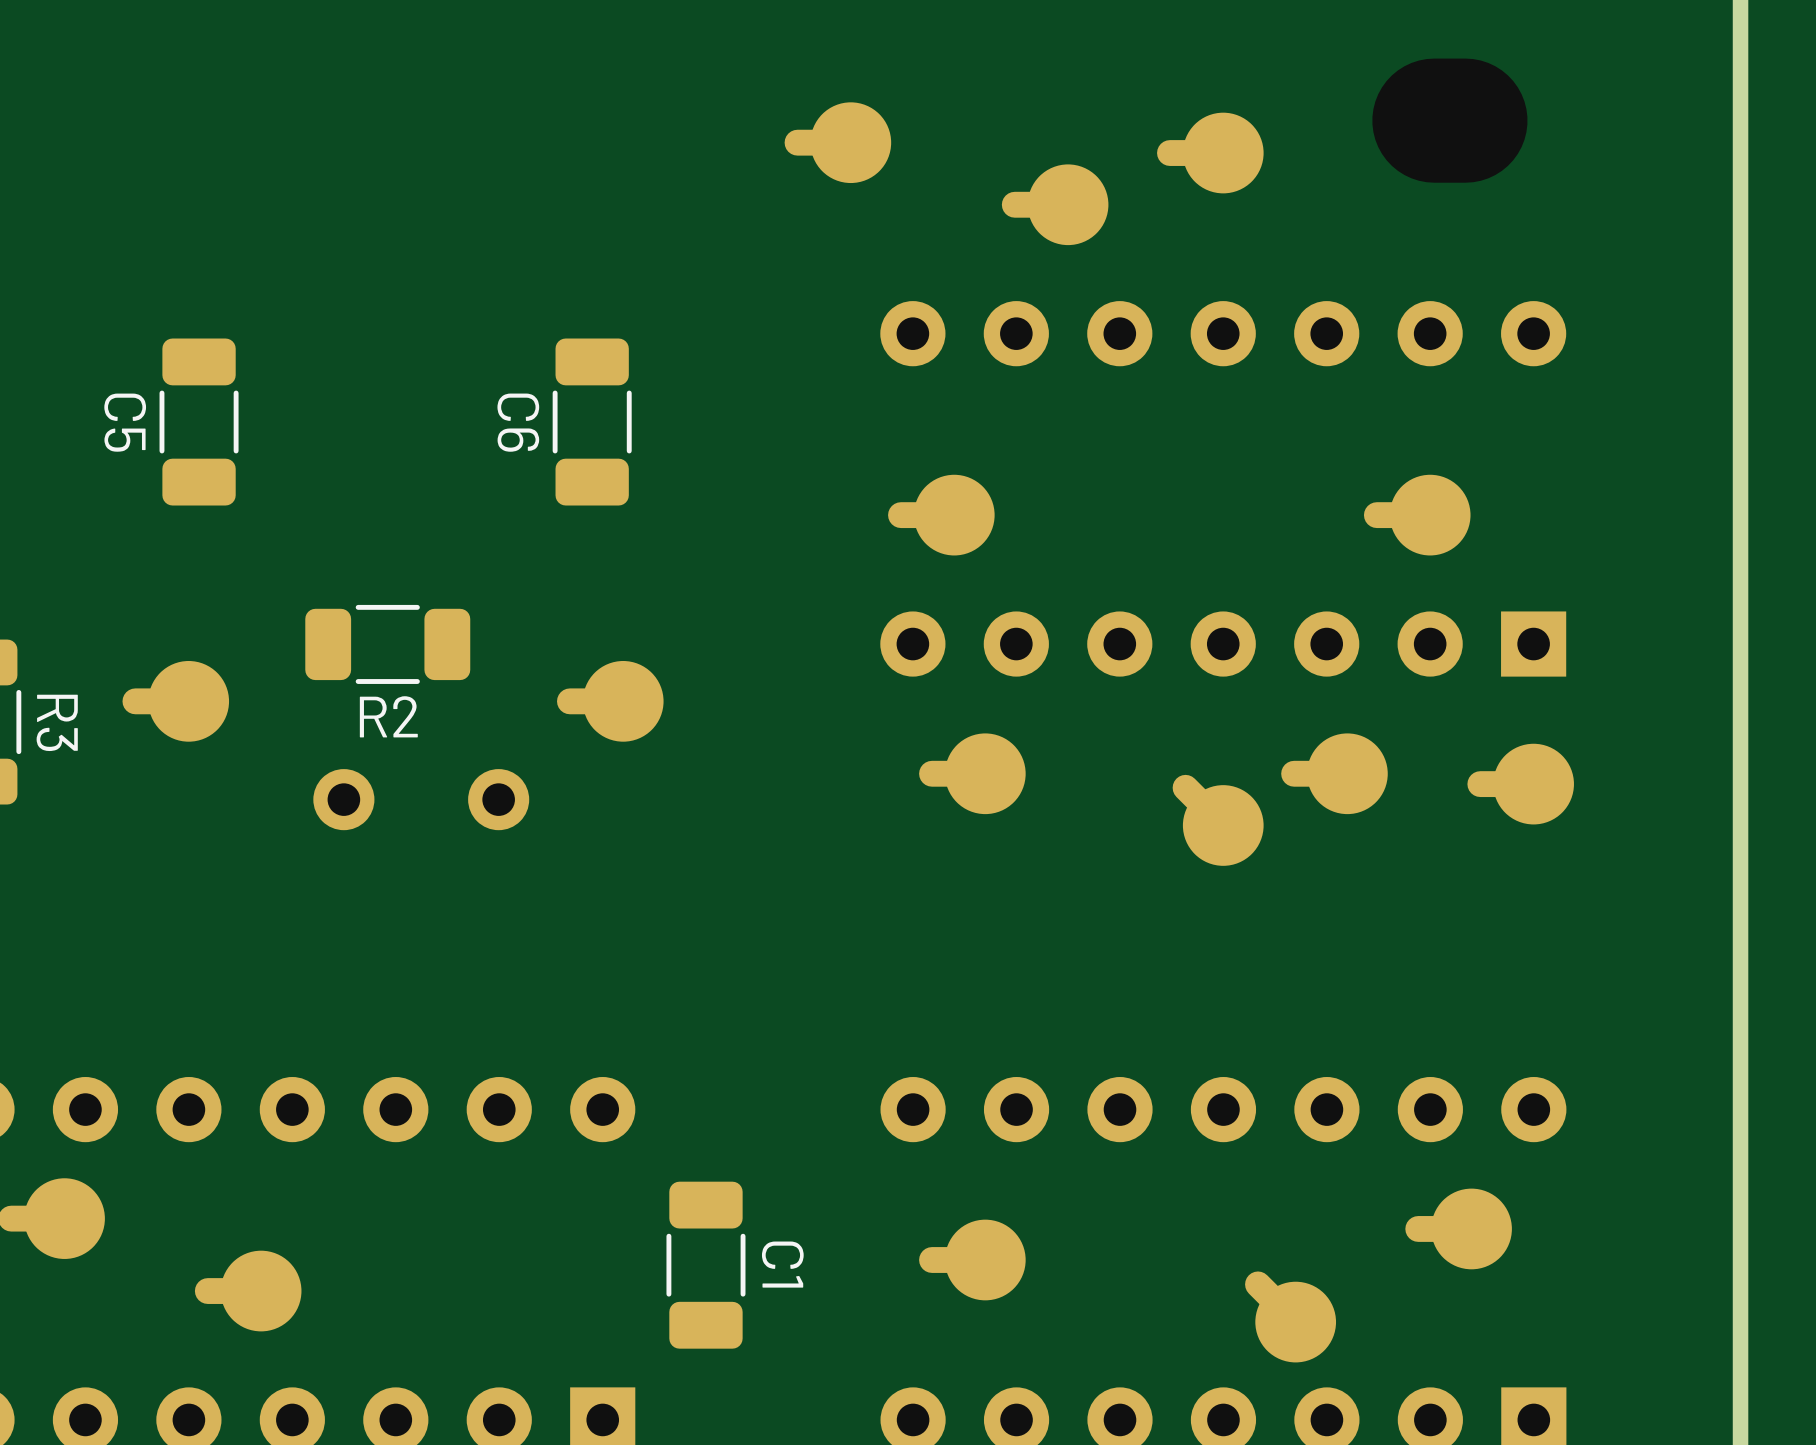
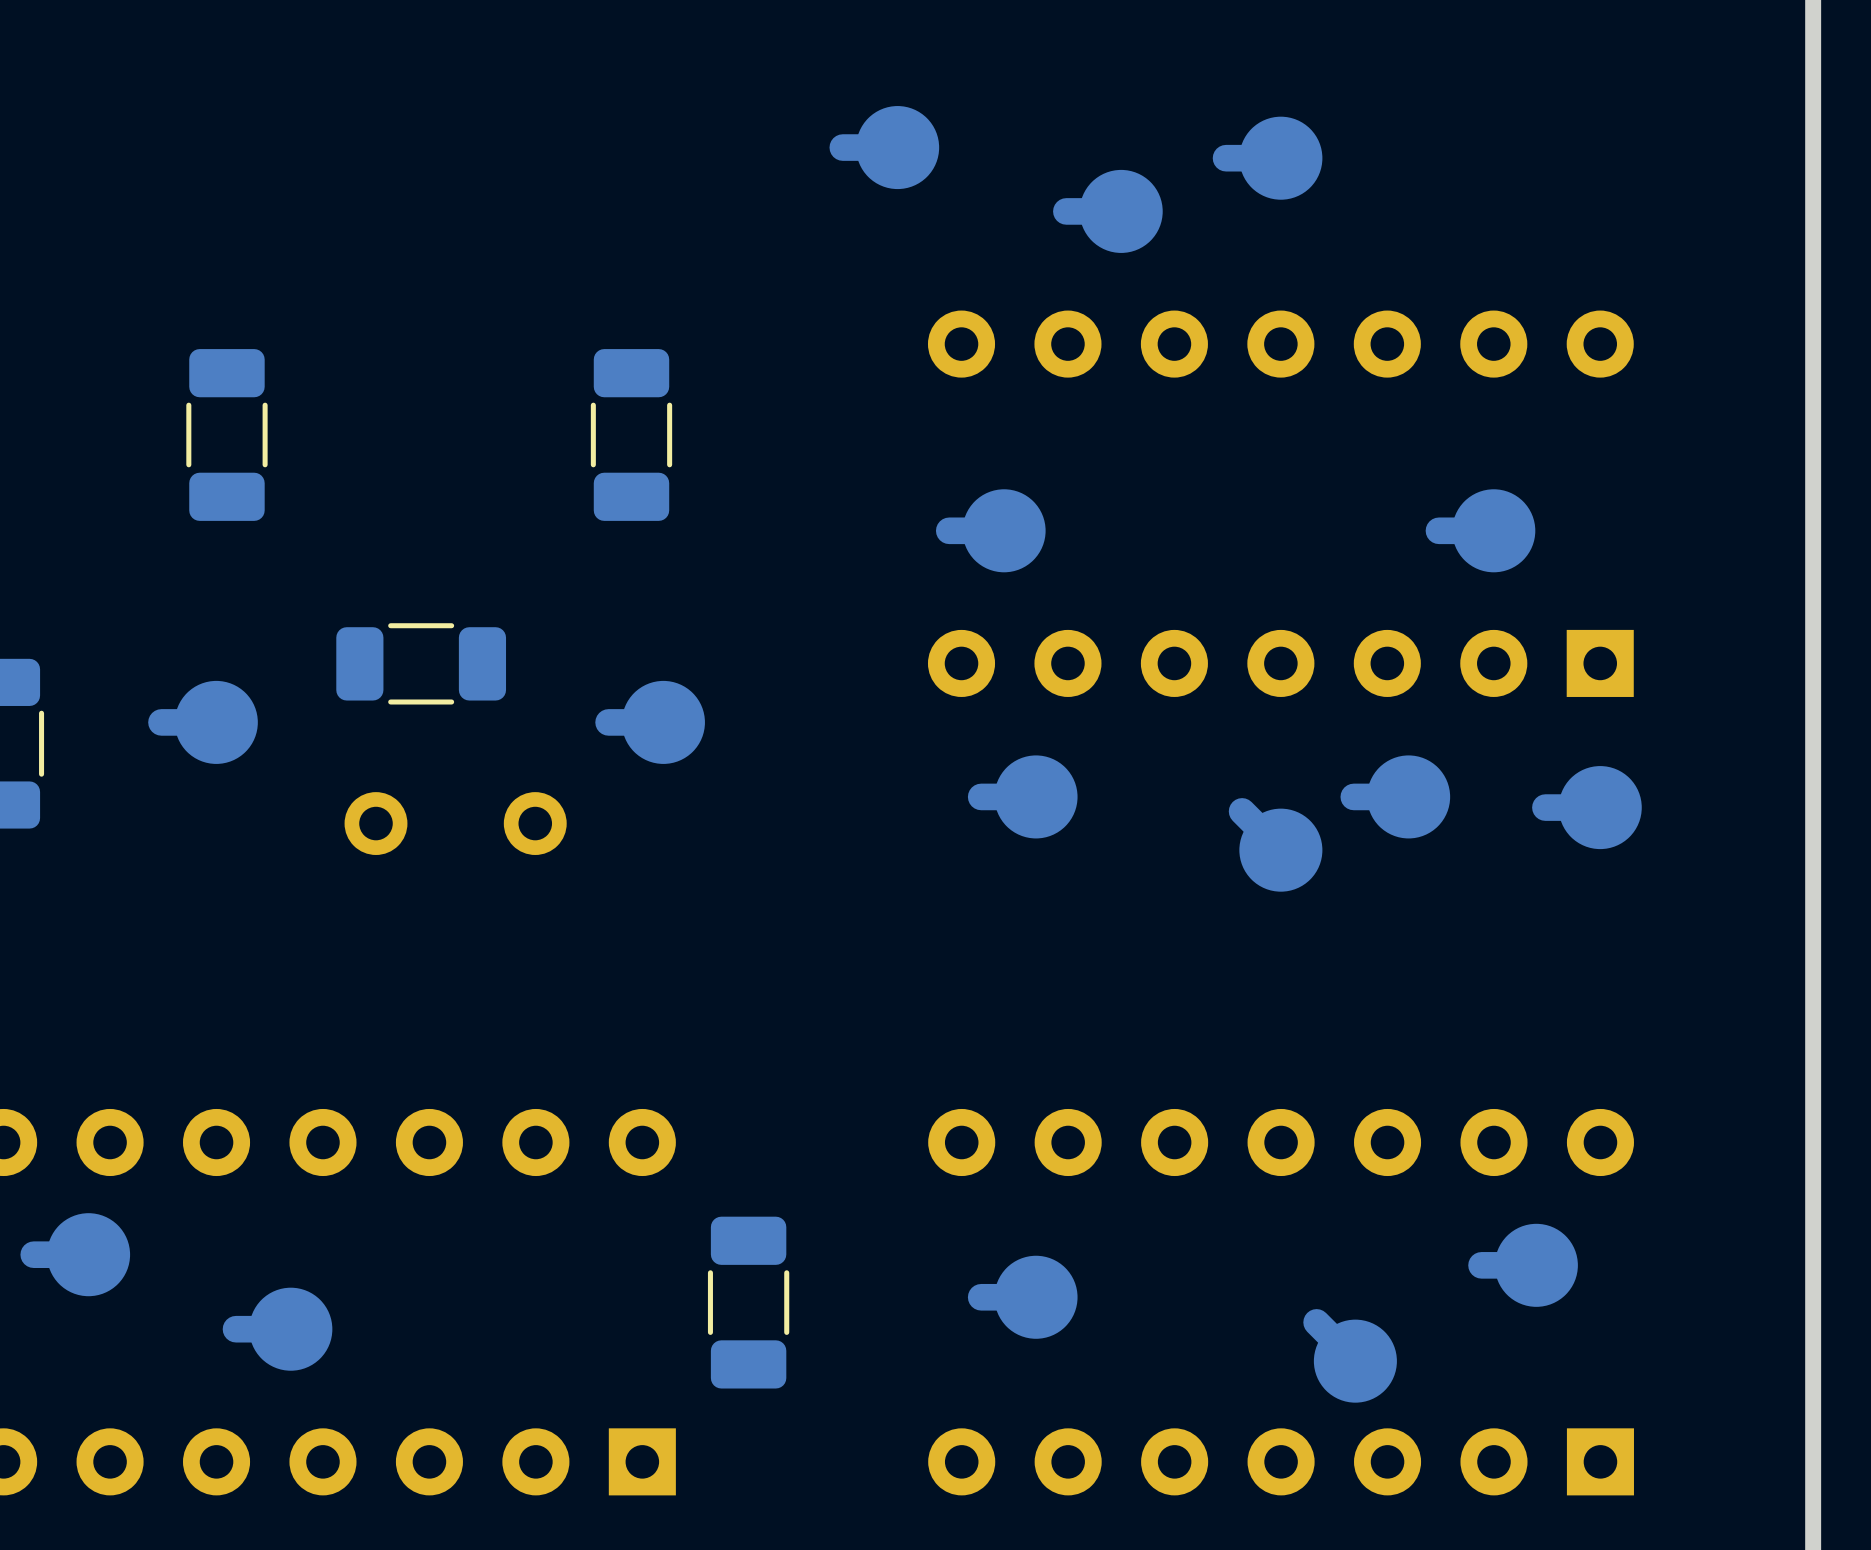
C5 name: C5 (125, 422) -> none
C6 name: C6 (518, 422) -> none
R2 name: R2 (388, 716) -> none
R3 name: R3 (57, 722) -> none
C1 name: C1 (782, 1264) -> none

